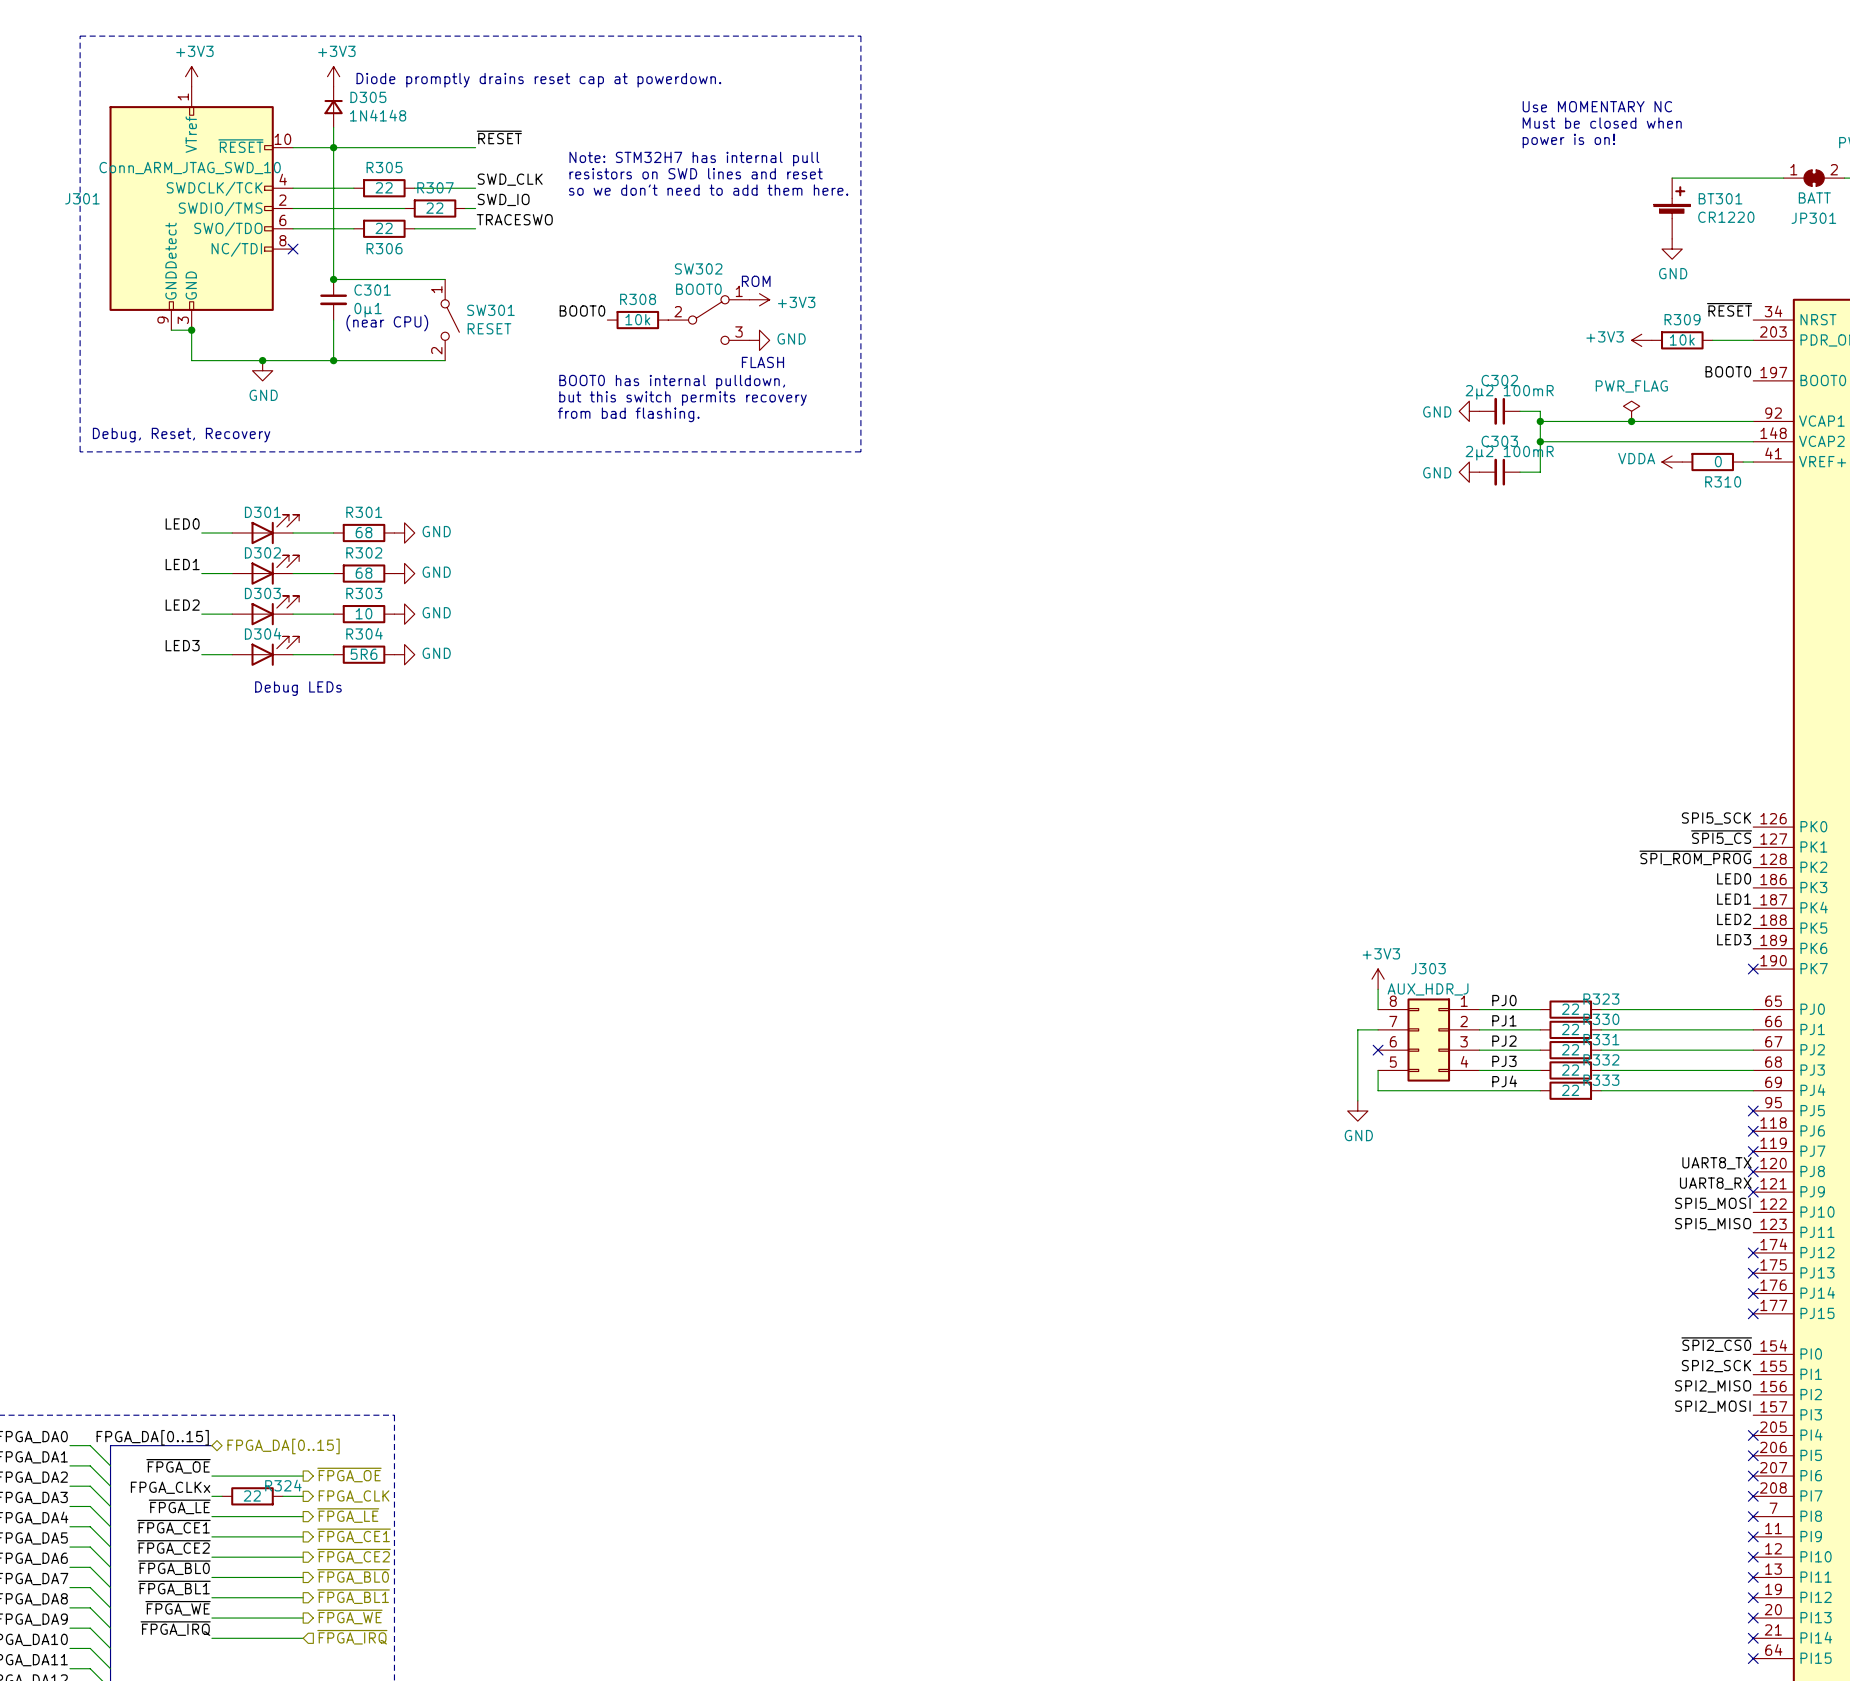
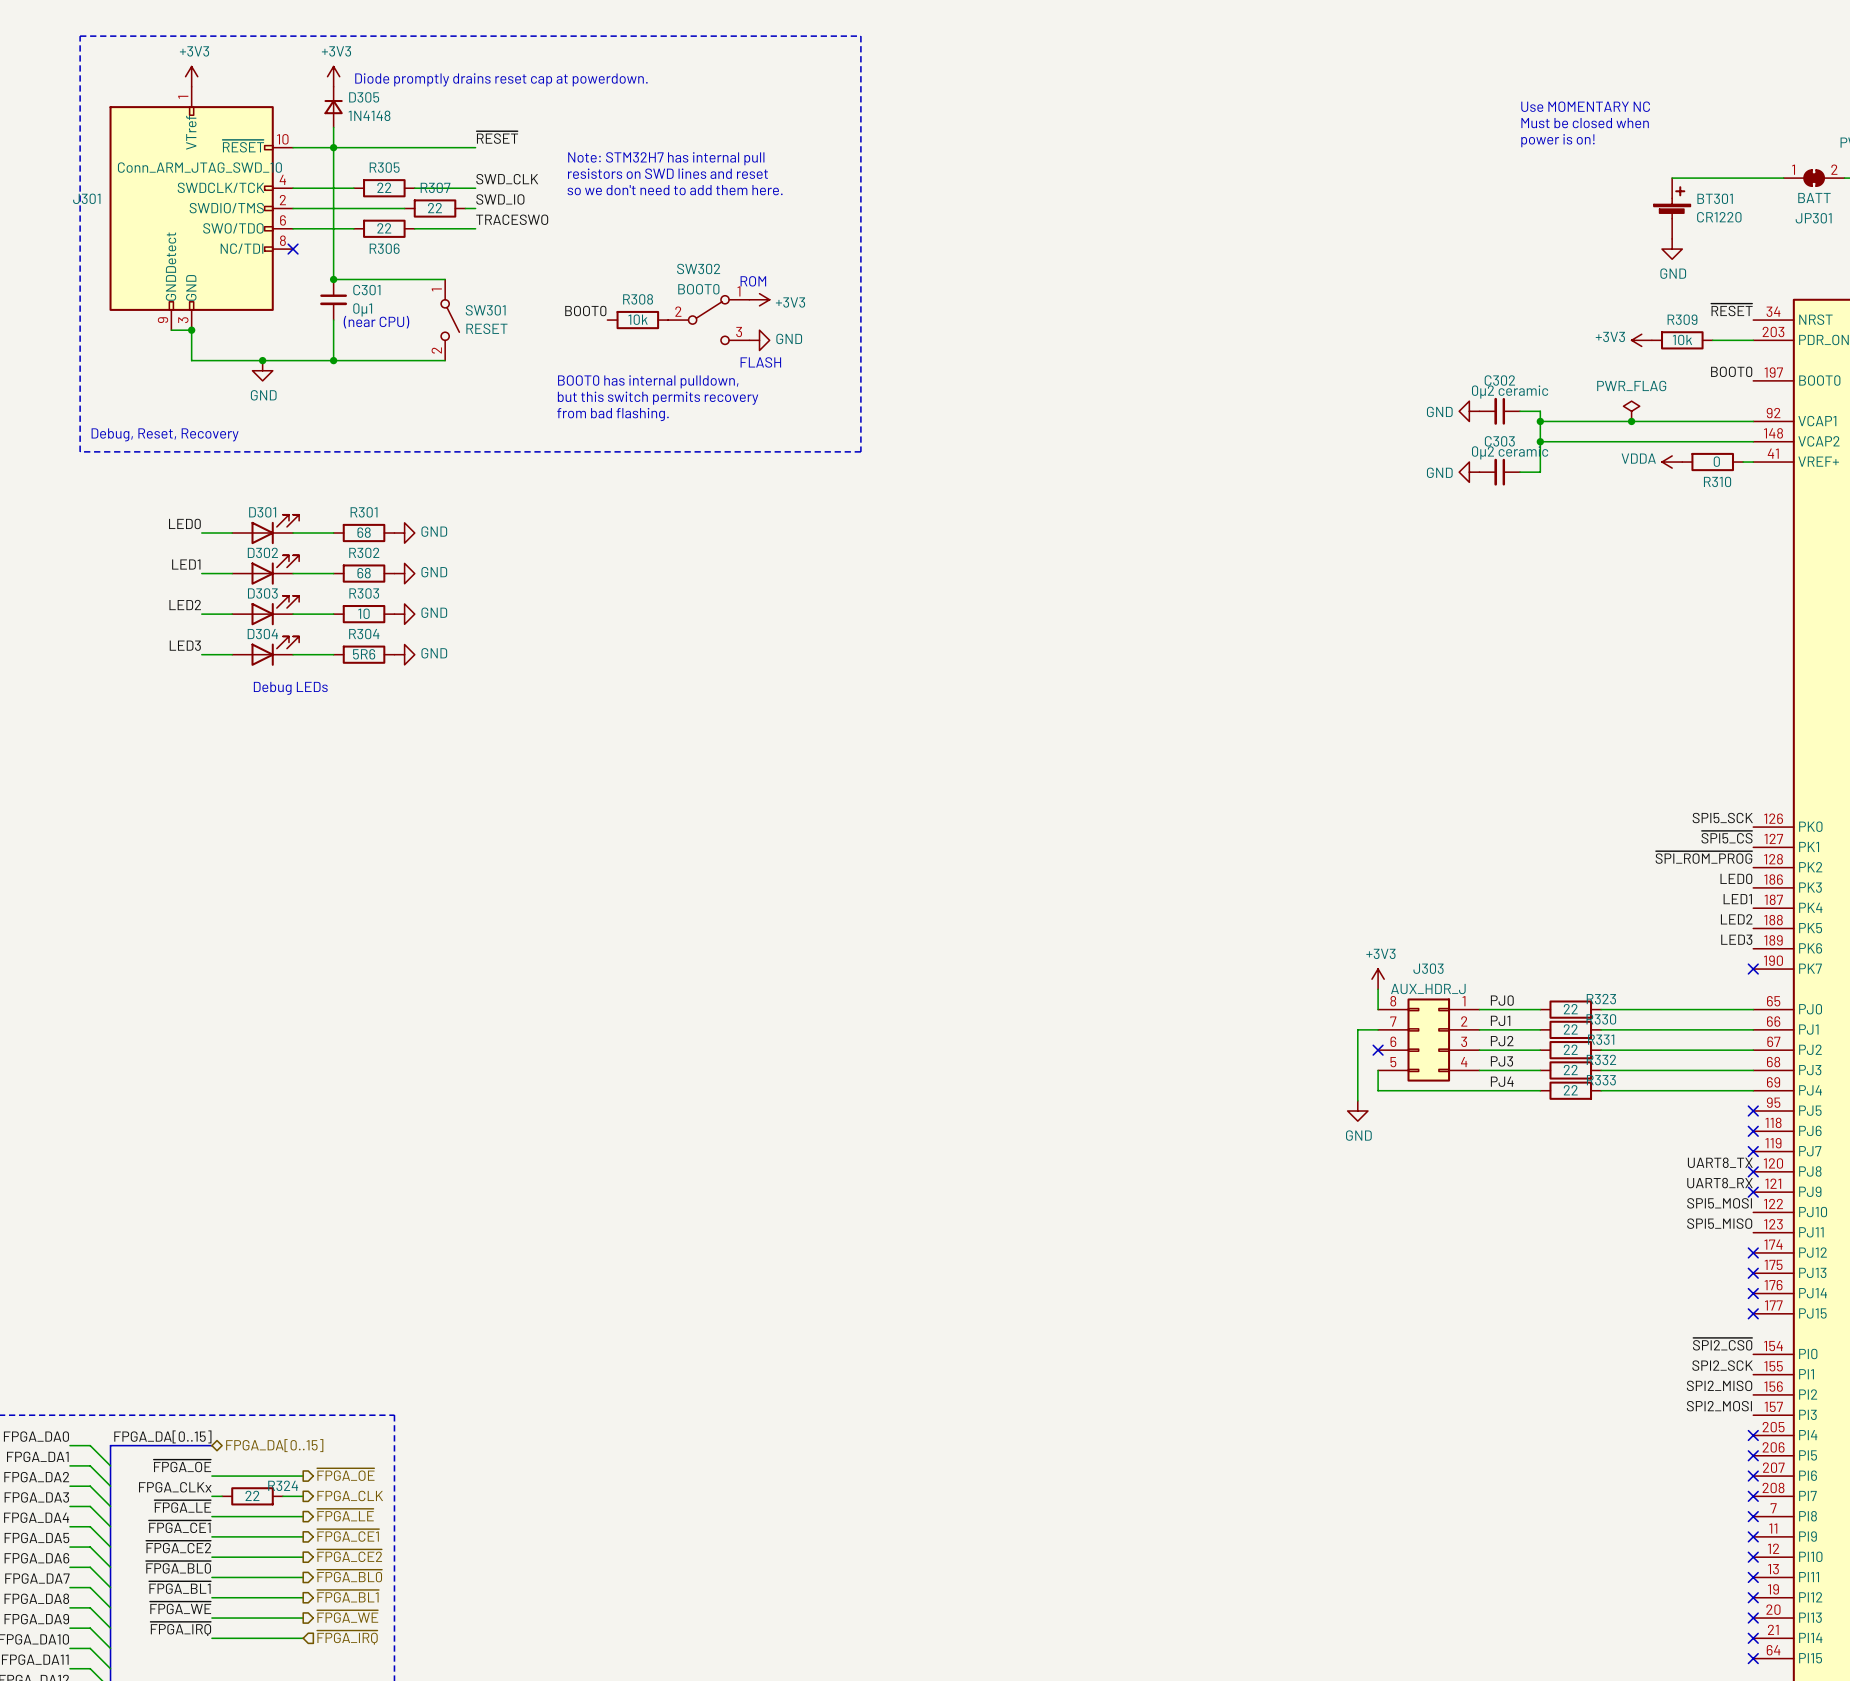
C302 value: 2µ2 100mR (1509, 392) -> 0µ2 ceramic (1510, 392)
C303 value: 2µ2 100mR (1509, 453) -> 0µ2 ceramic (1510, 452)

